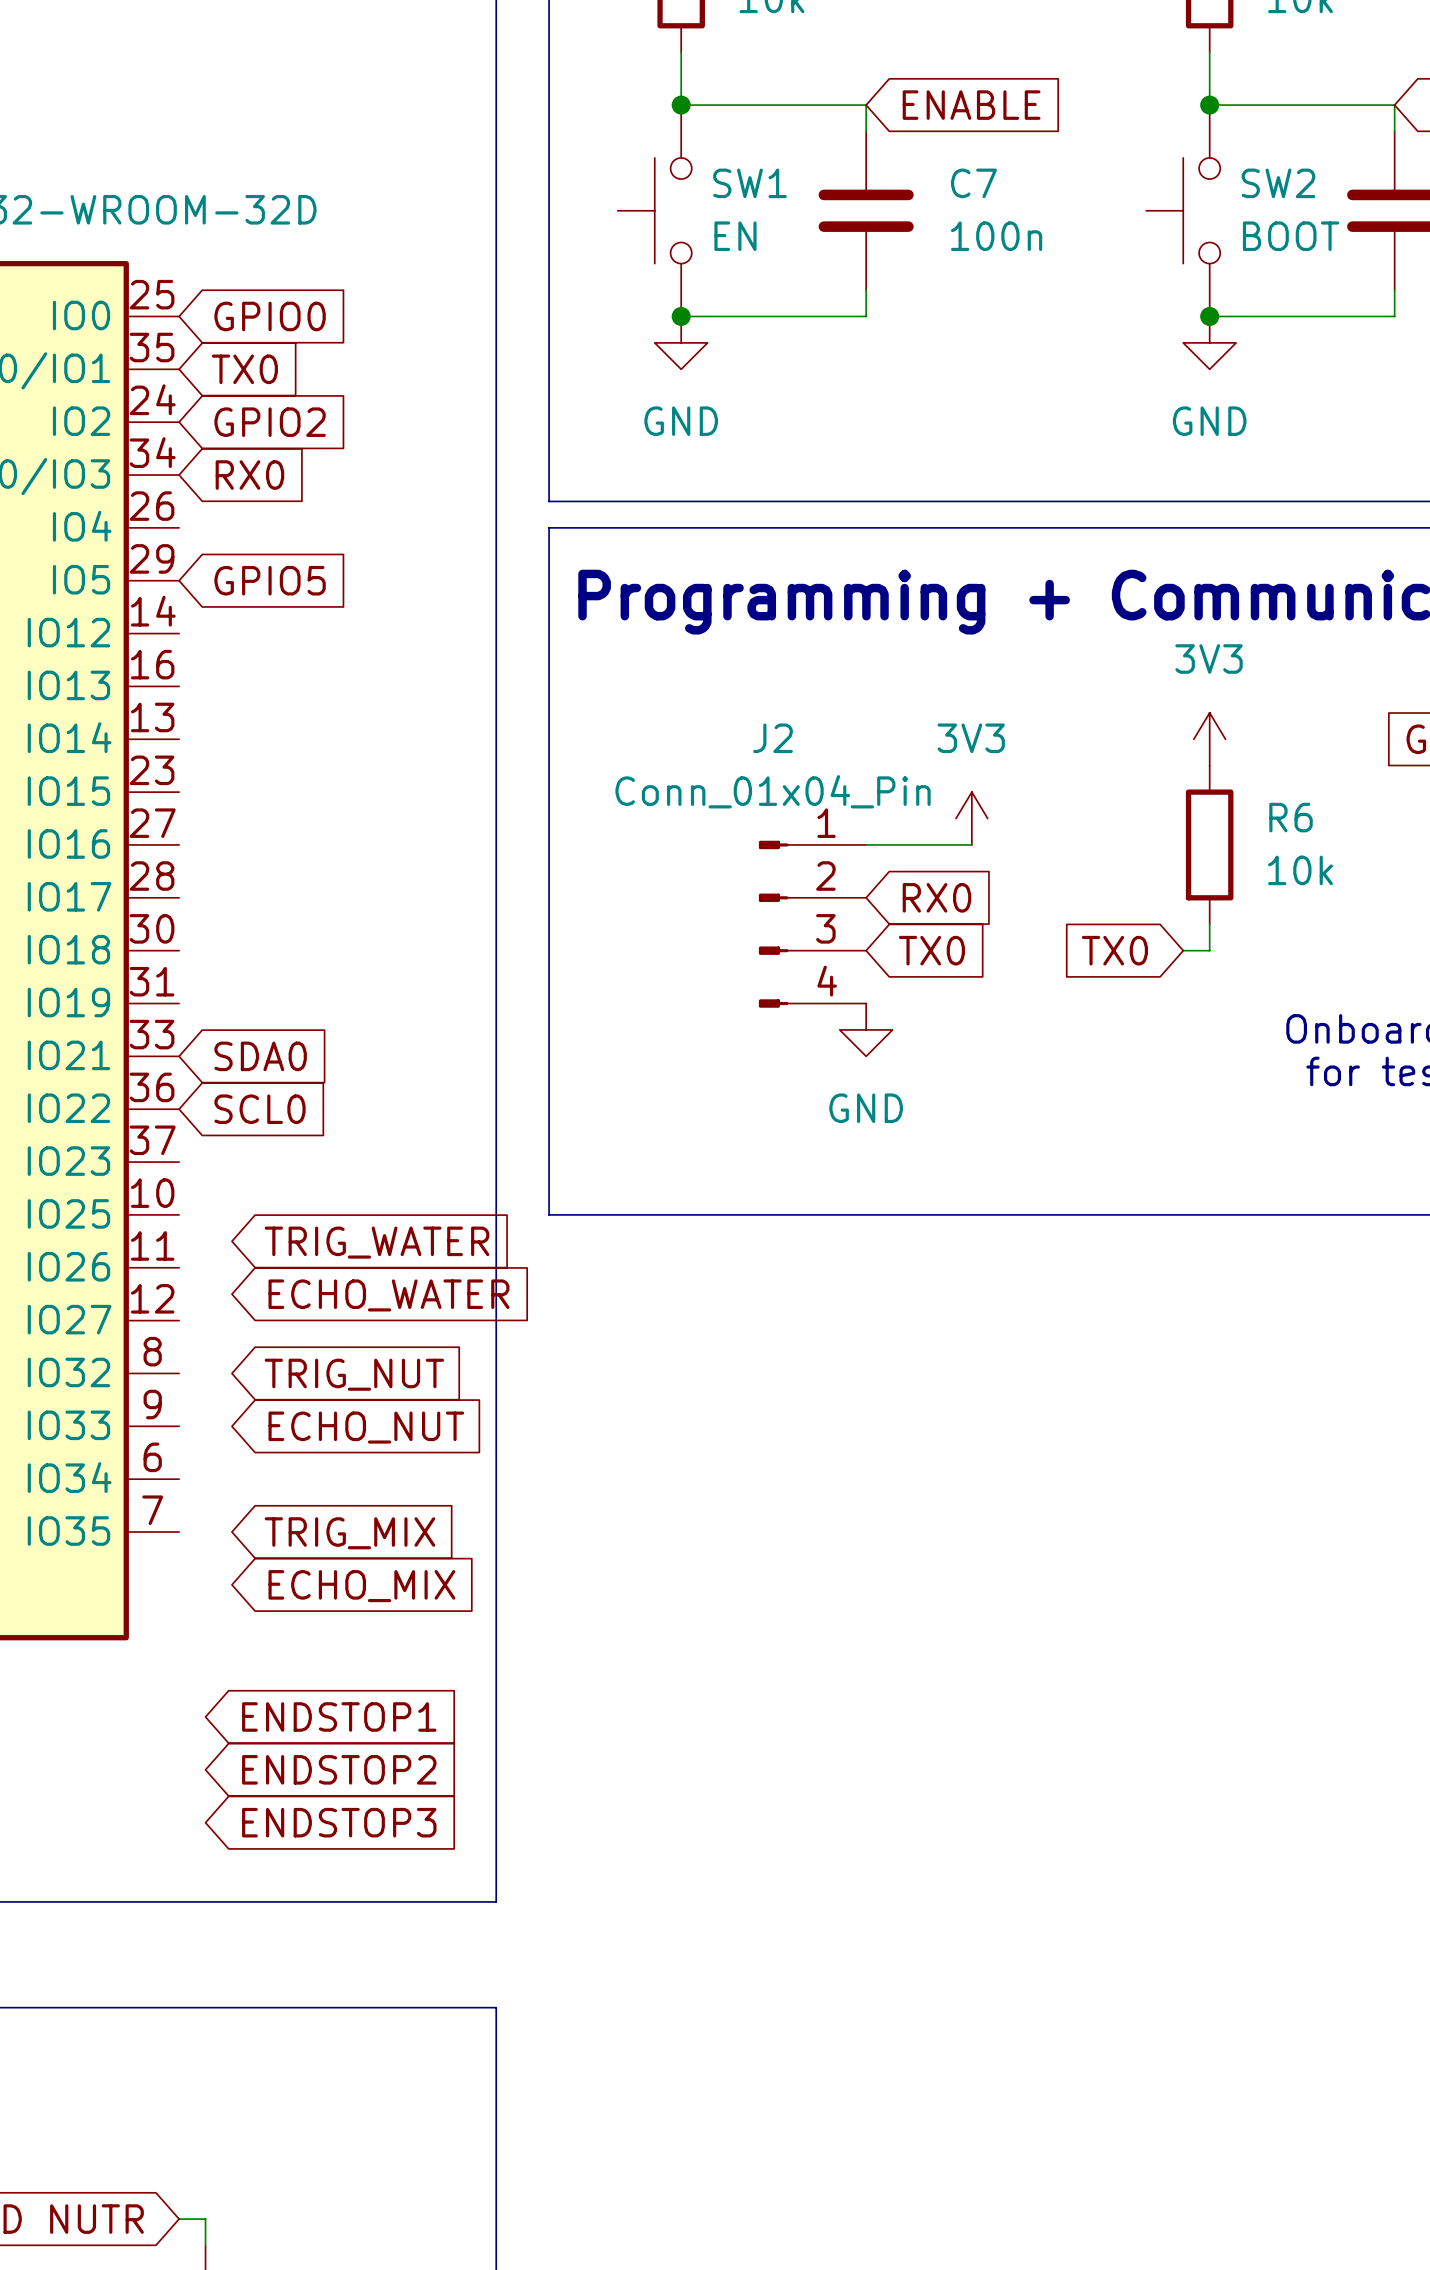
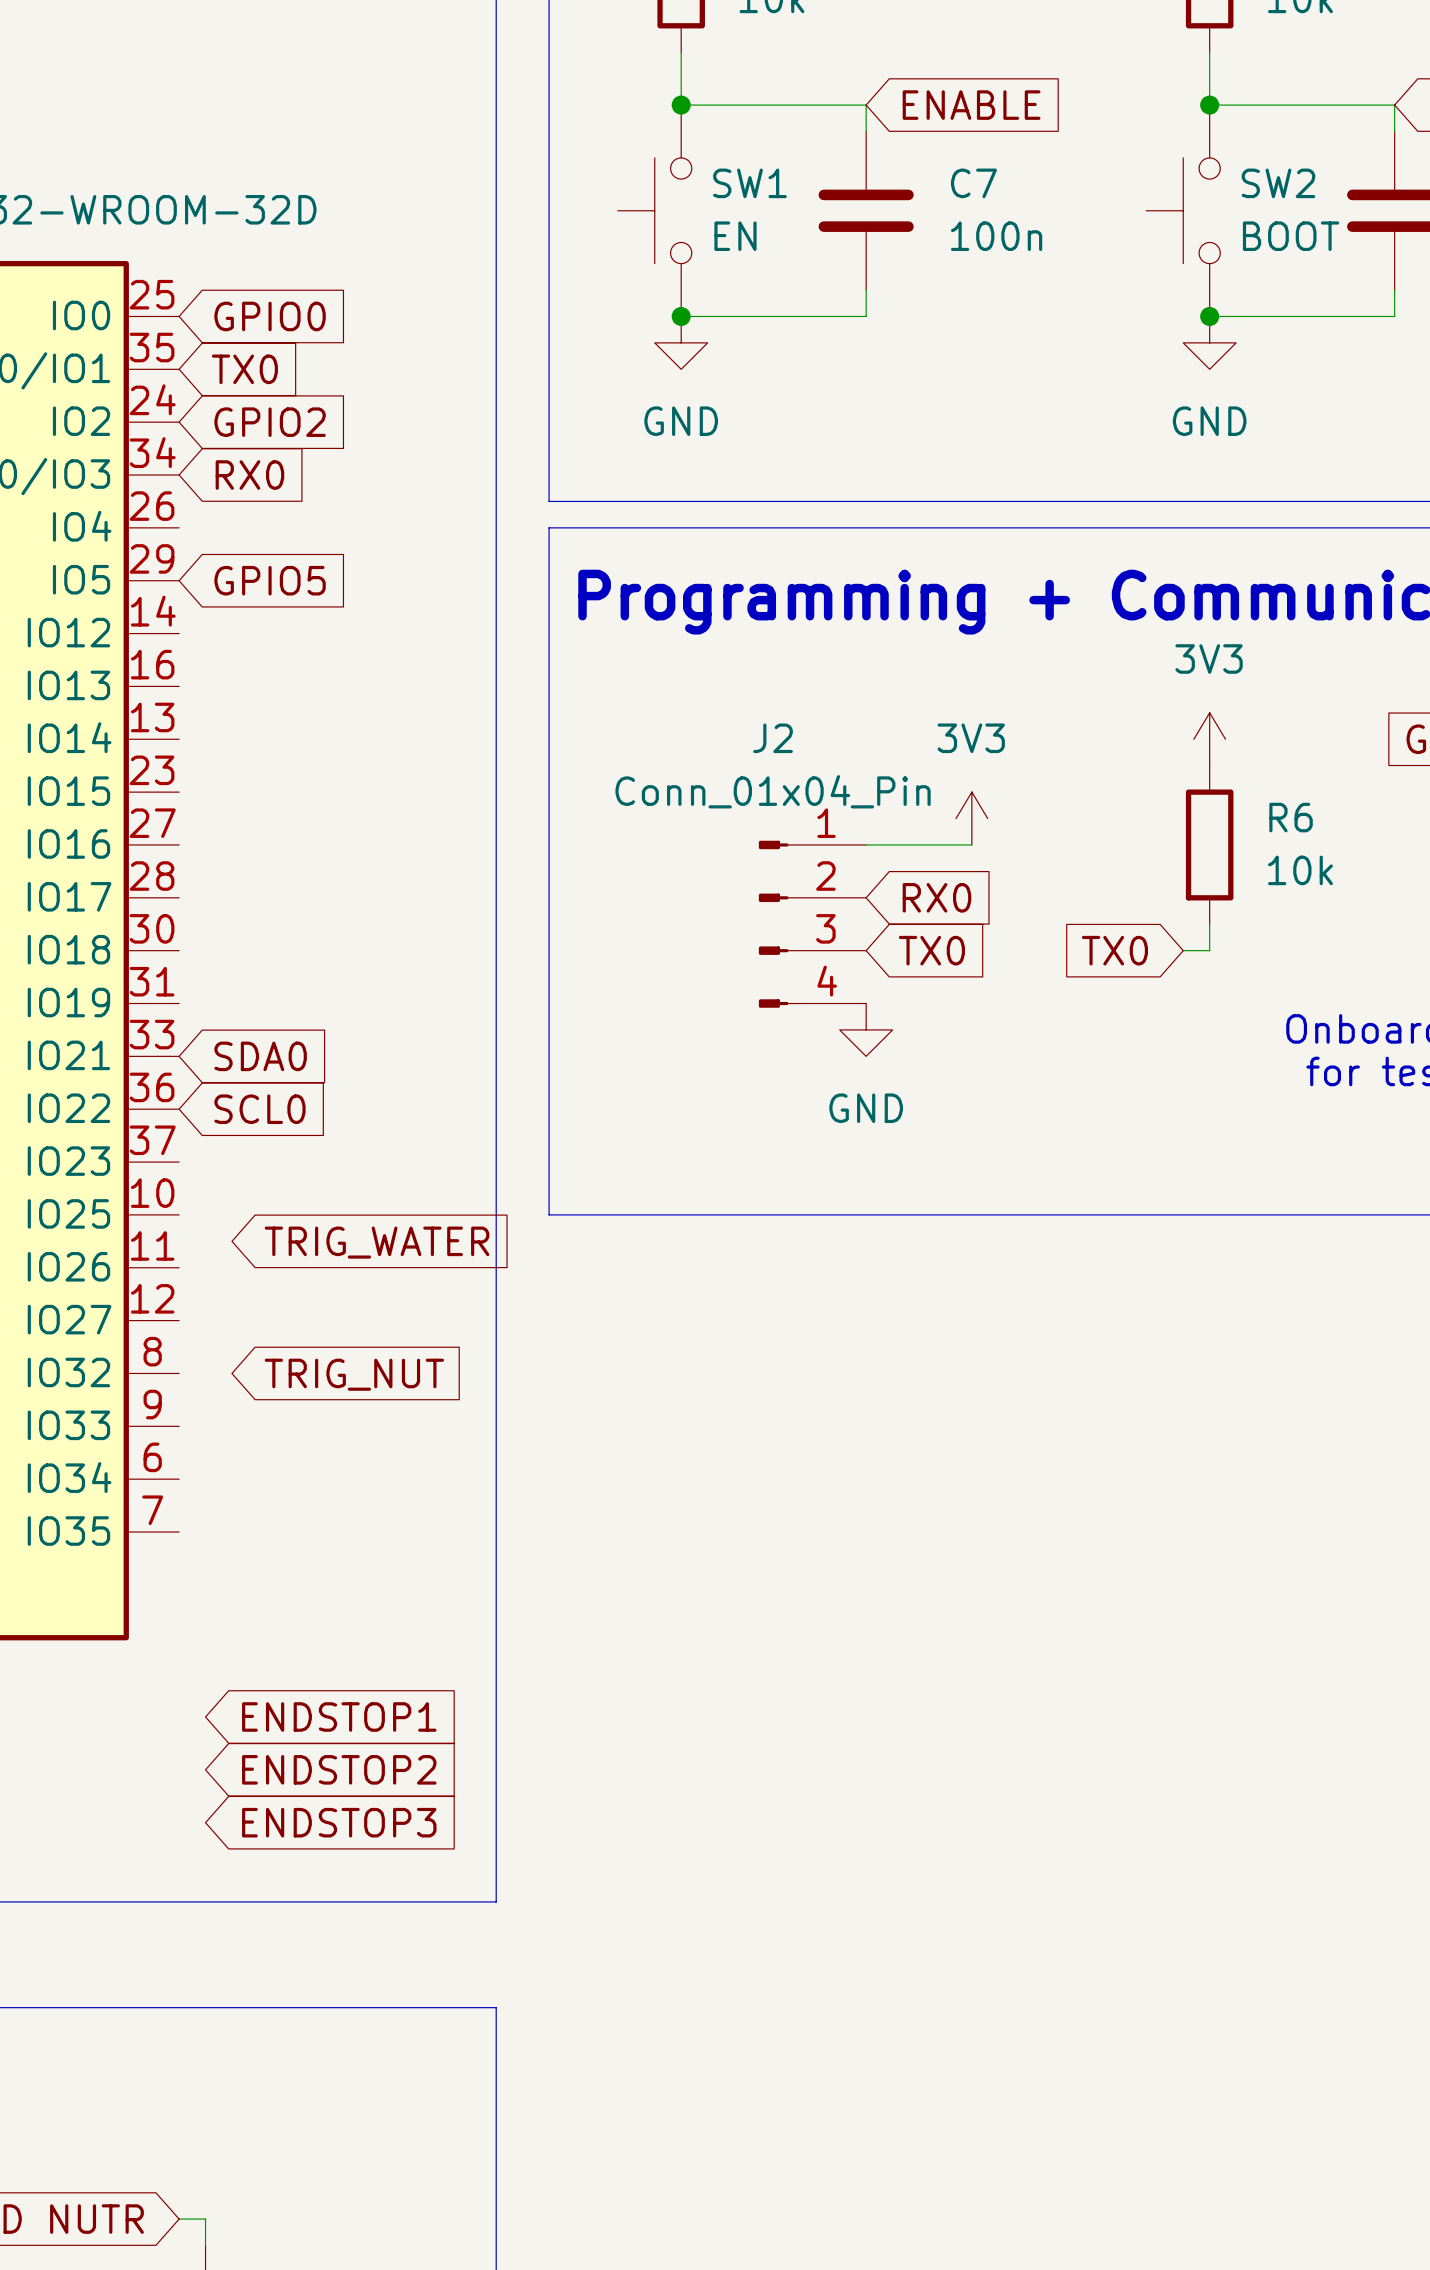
global label: ECHO_WATER (388, 1295) -> none
global label: ECHO_NUT (366, 1427) -> none
global label: TRIG_MIX (349, 1533) -> none
global label: ECHO_MIX (361, 1586) -> none

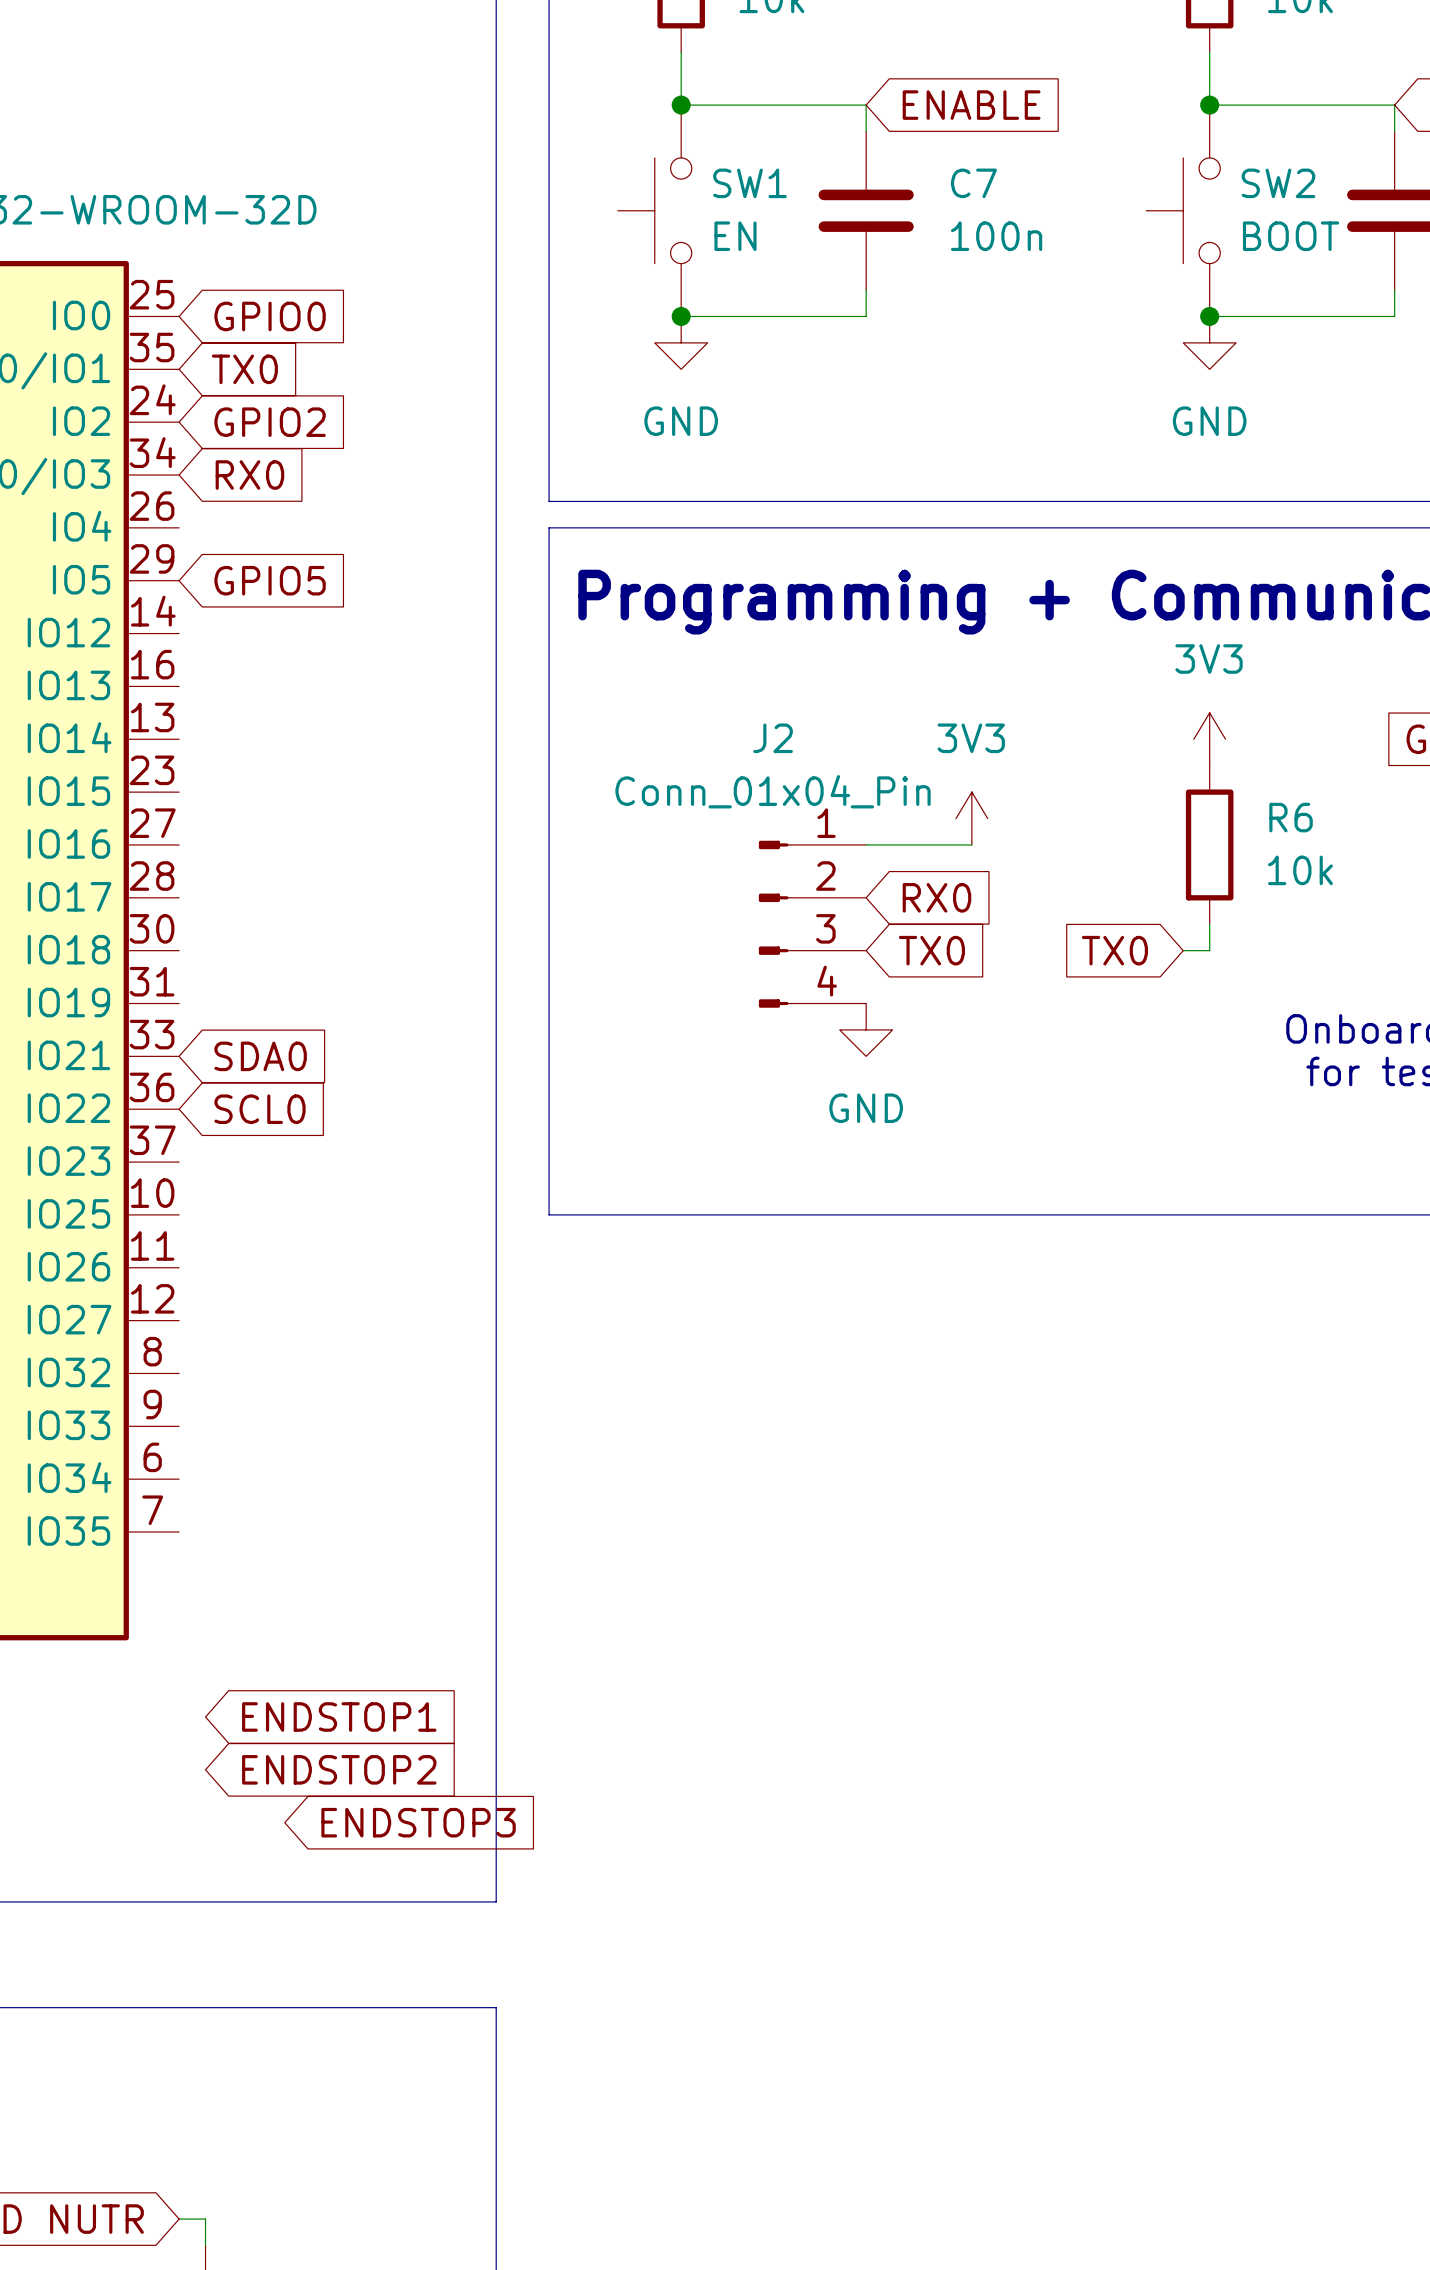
global label: TRIG_WATER (377, 1242) -> none
global label: TRIG_NUT (354, 1374) -> none
global label position: ENDSTOP3 (339, 1822) -> ENDSTOP3 (418, 1822)

